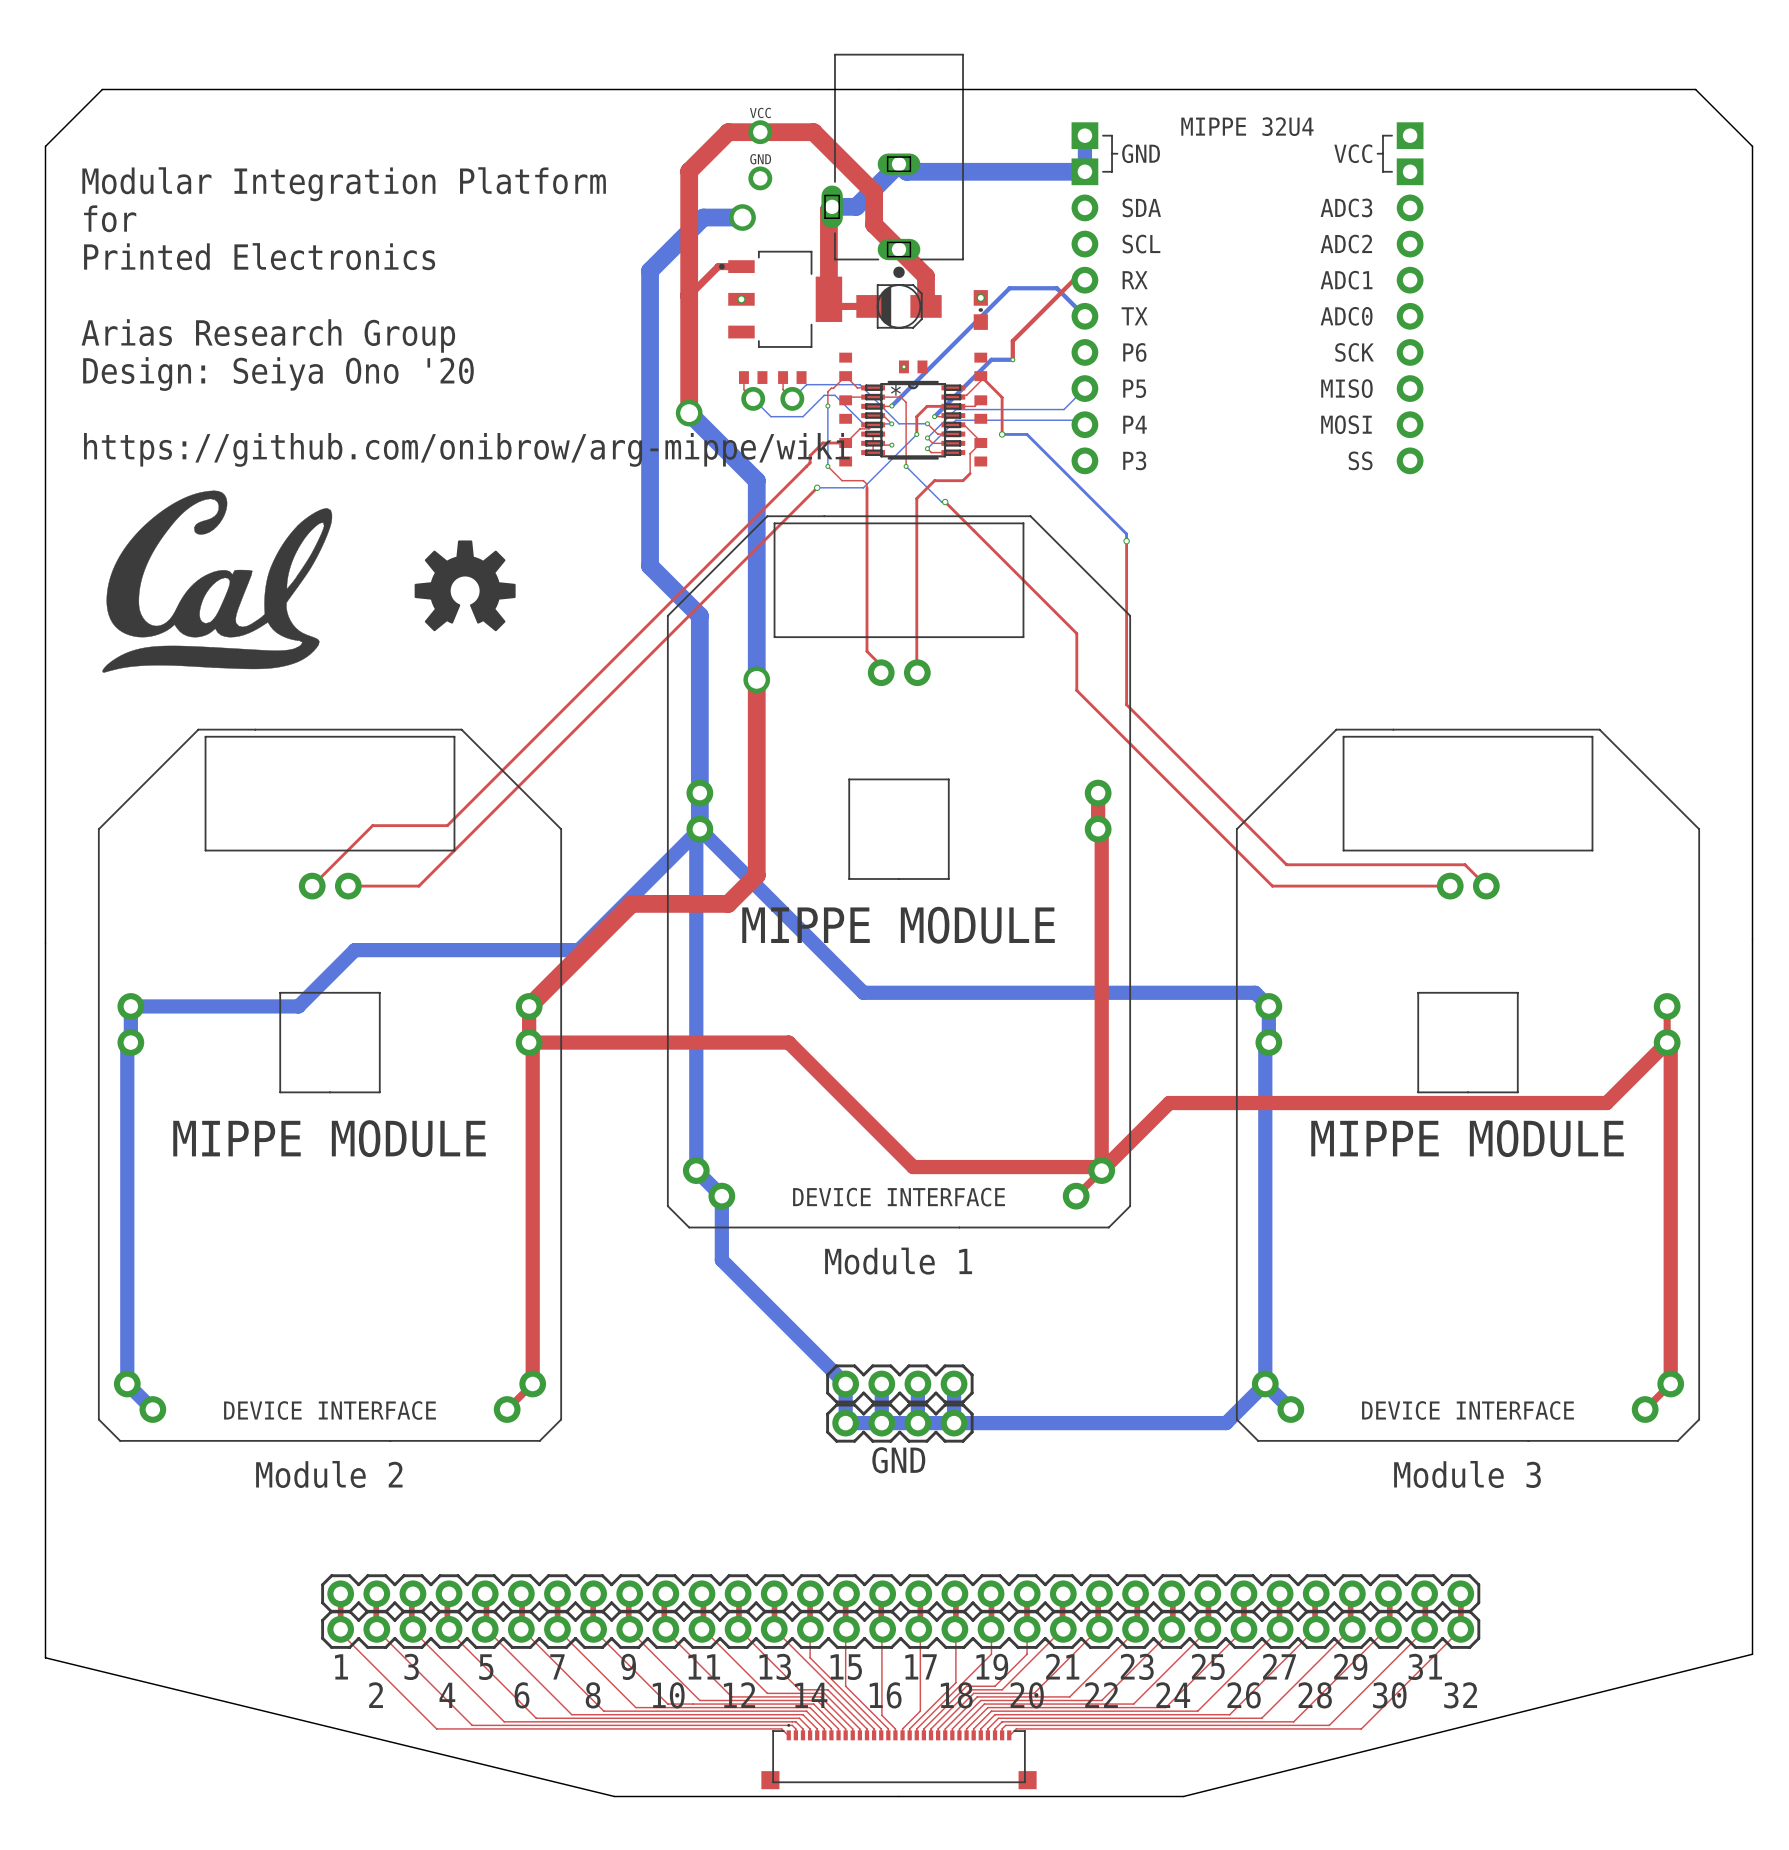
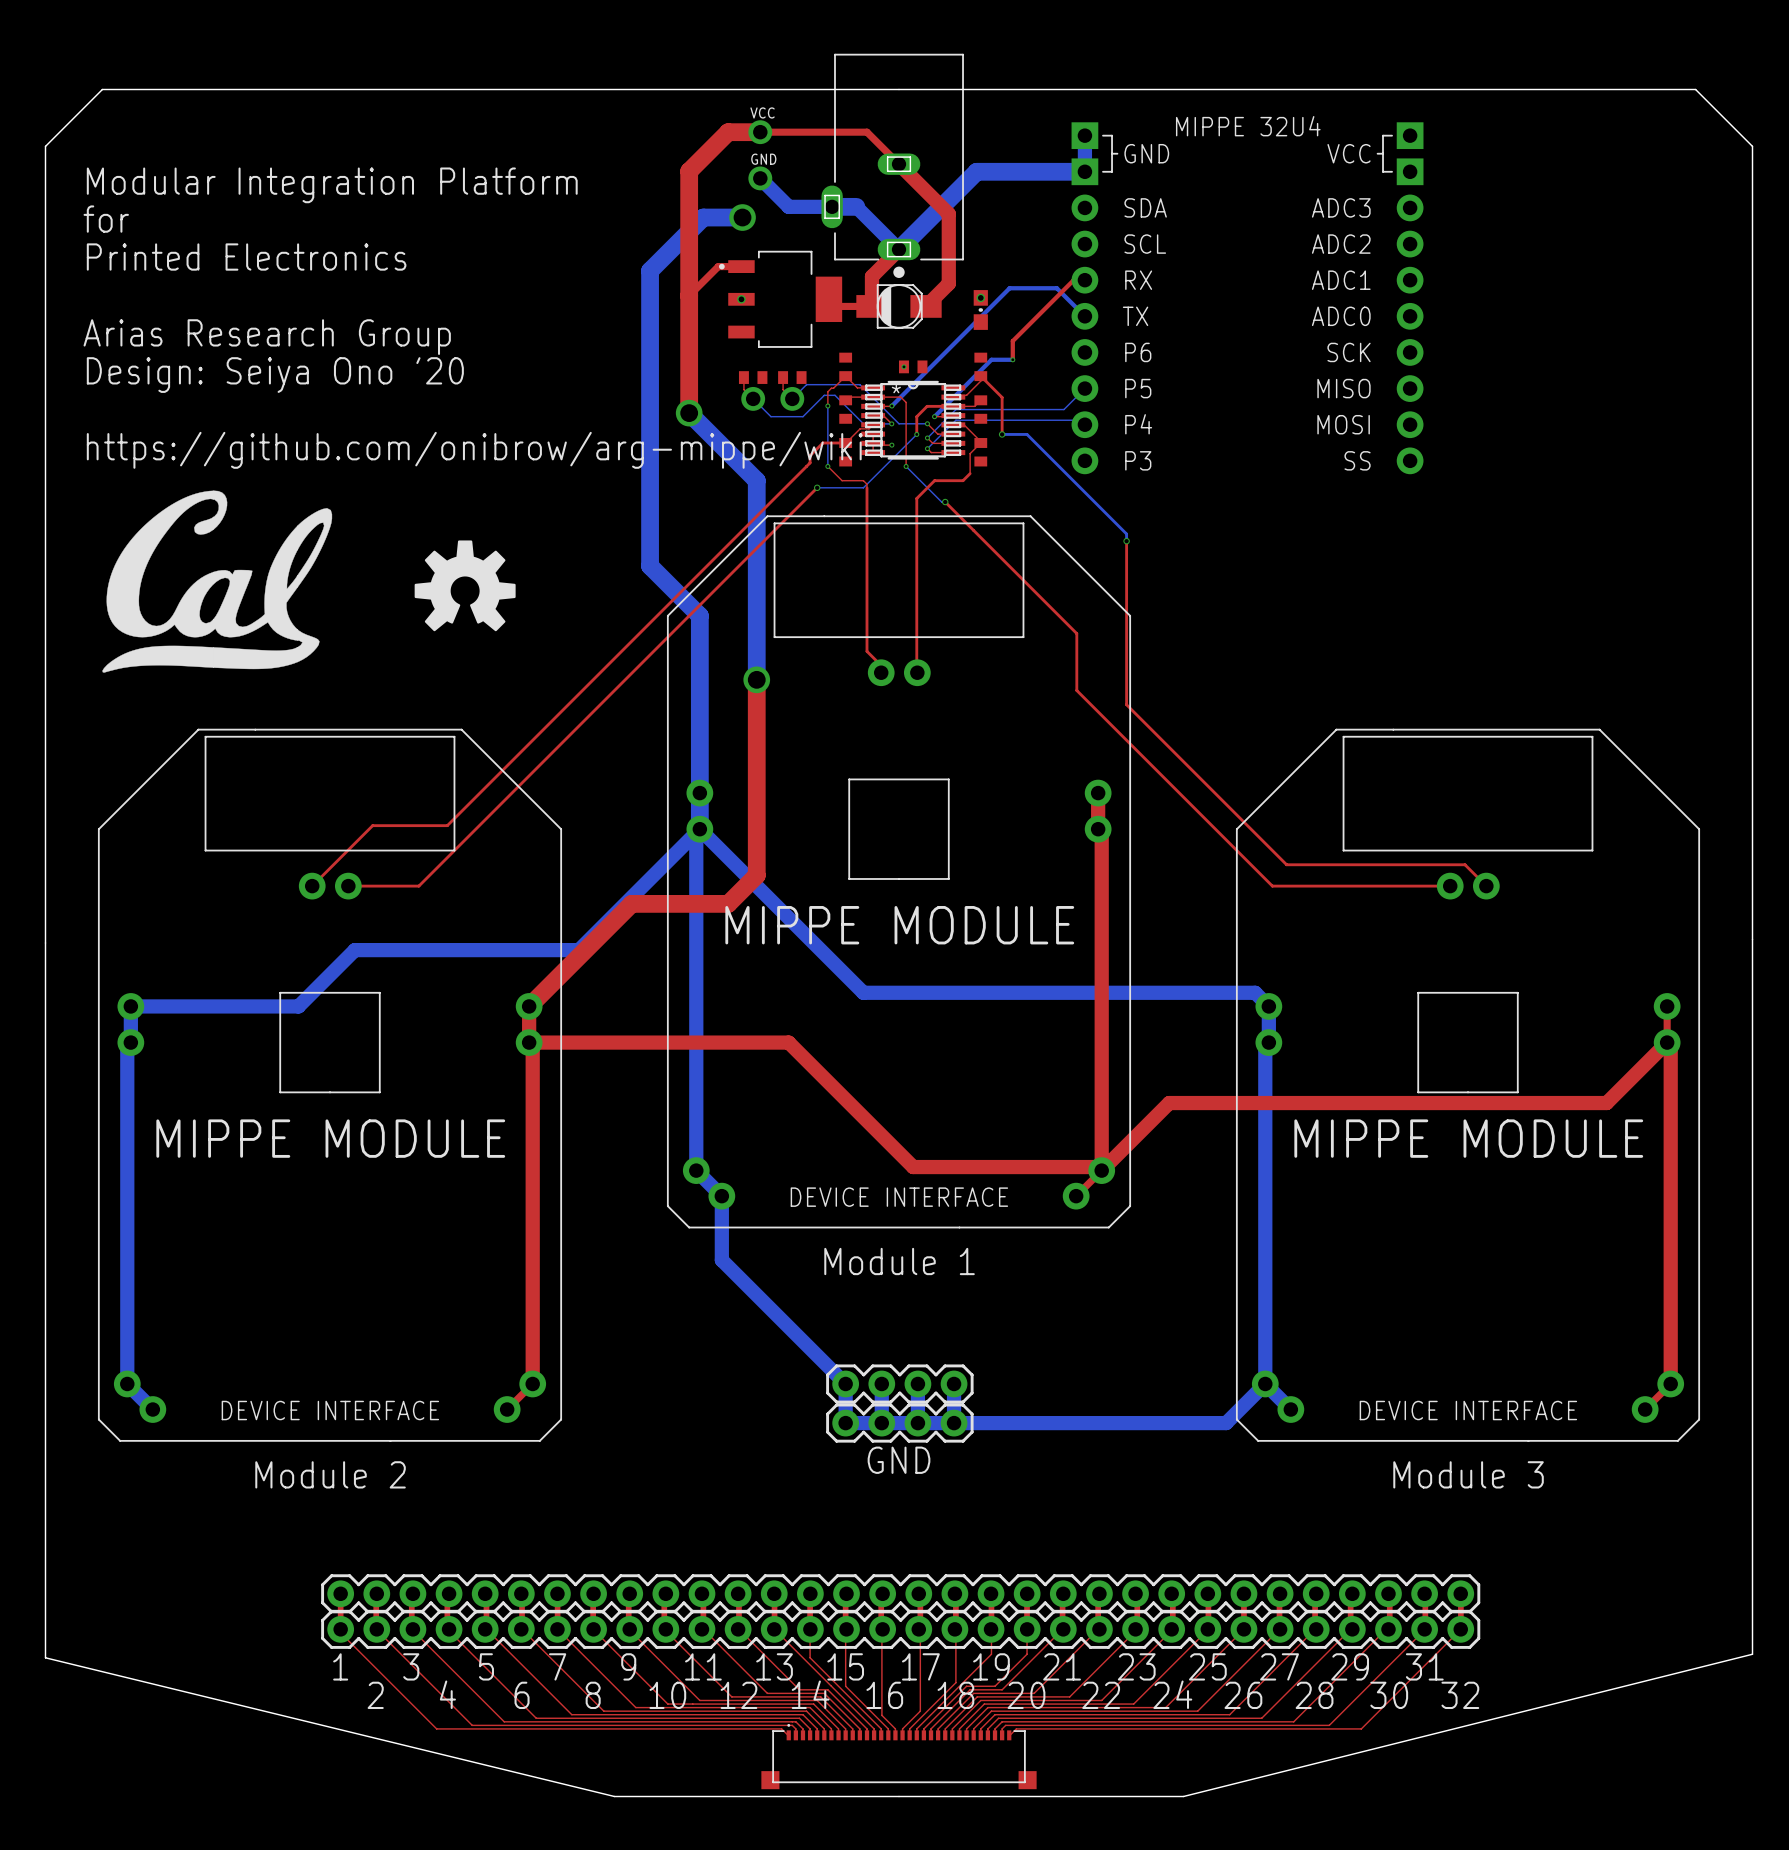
top track width: thick (760, 132) (813, 132) -> thin (760, 132) (813, 132)
top track: (813, 132) (874, 192) (874, 224) (926, 276) (926, 306) -> (813, 132) (866, 132) (948, 213) (948, 283) (926, 306)
bottom track: (976, 171) (906, 171) (899, 164) (856, 206) -> (976, 171) (899, 249) (856, 206)
bottom track: none -> (760, 178) (788, 206) (832, 206)
top track: (832, 206) (828, 210) (828, 299) -> none
top track: none -> (899, 249) (871, 276) (871, 306)

